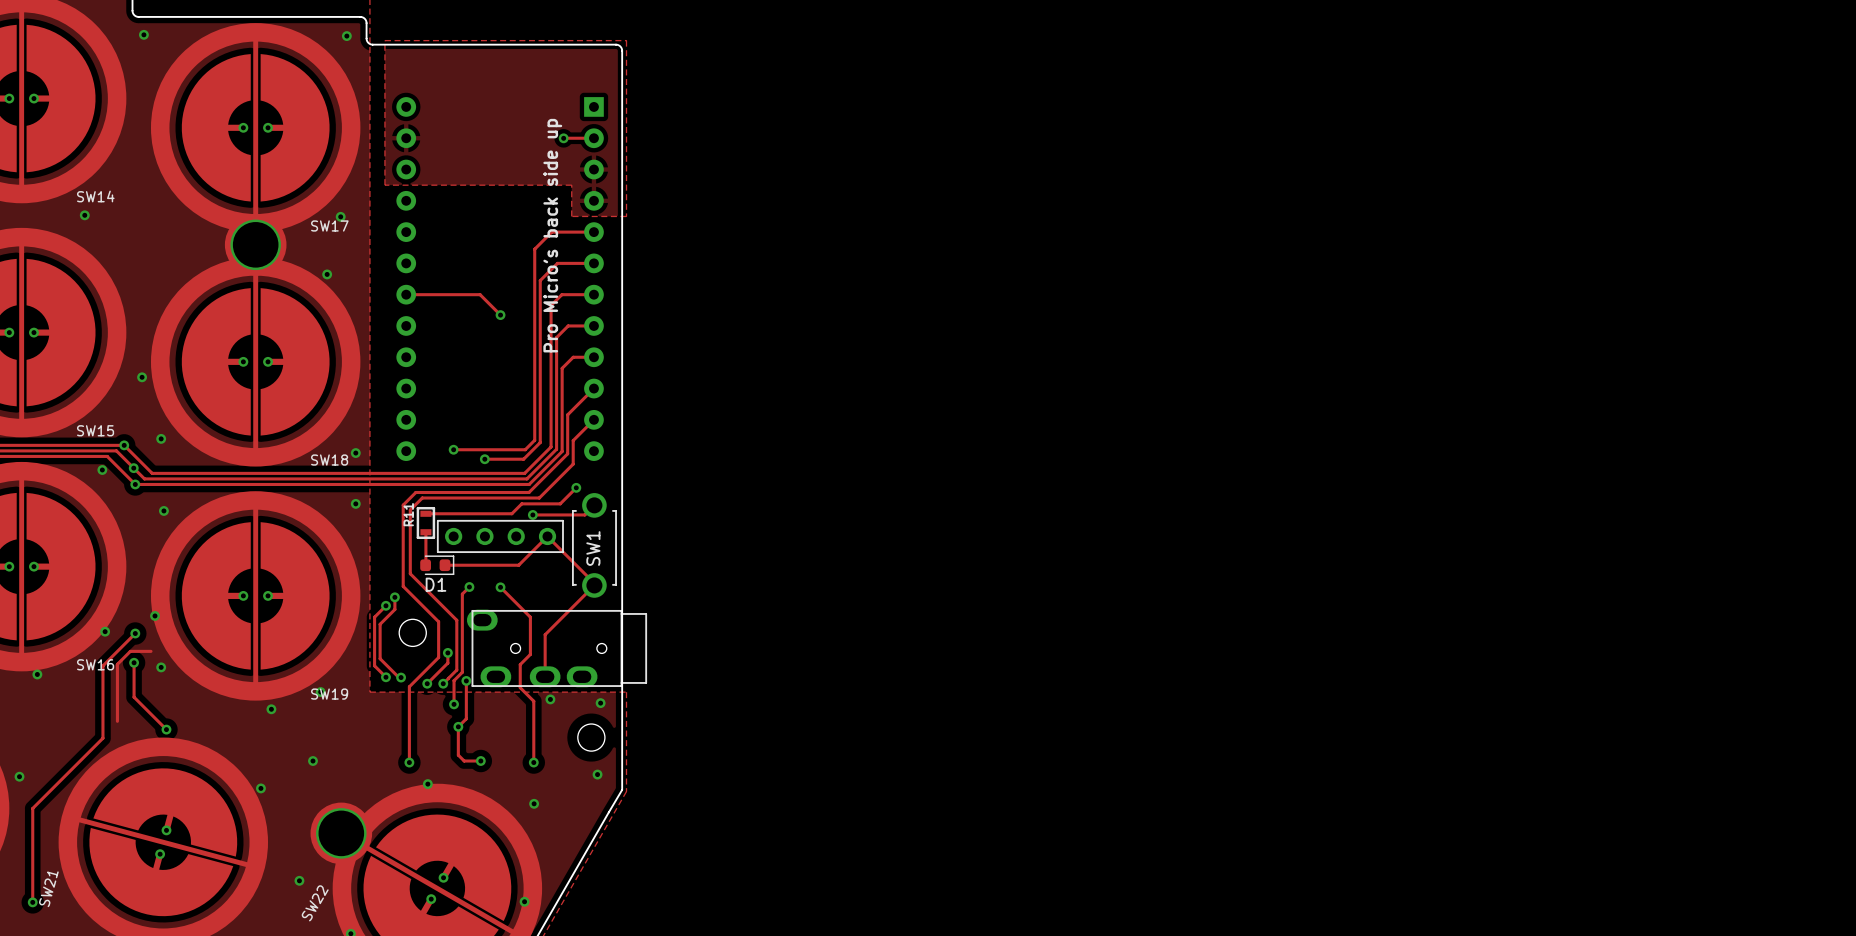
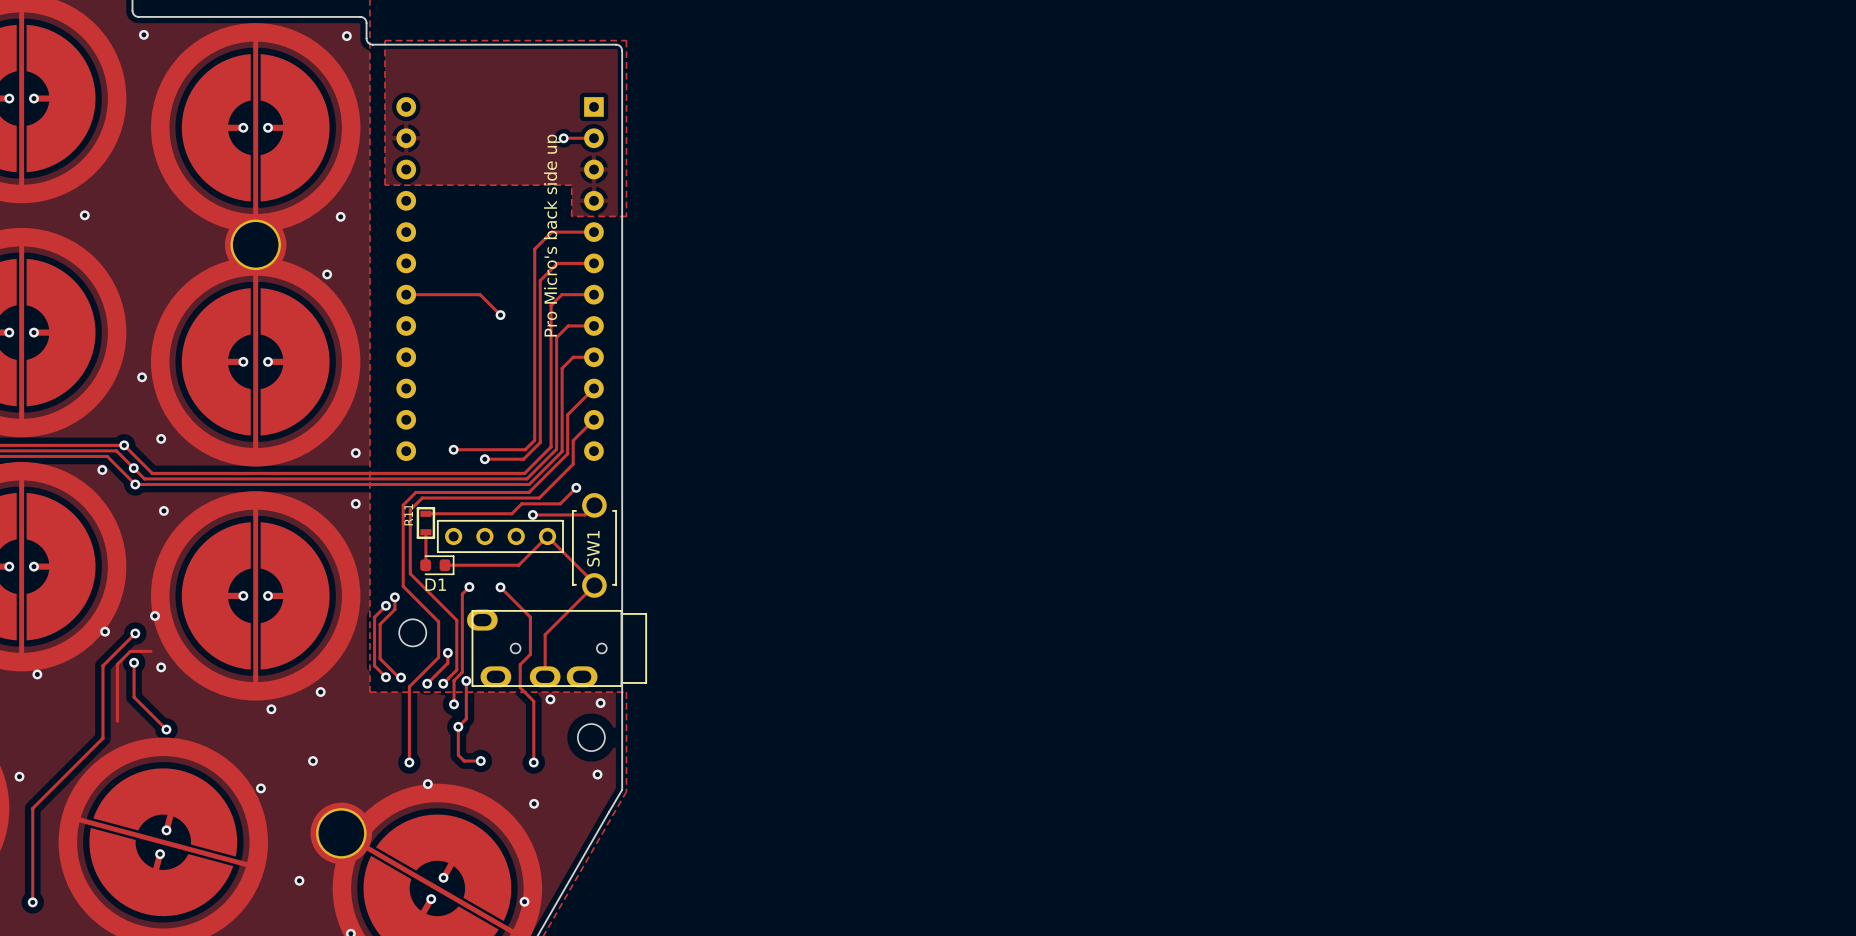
SW14 name: SW14 (95, 196) -> none
SW17 name: SW17 (329, 225) -> none
SW15 name: SW15 (95, 430) -> none
SW18 name: SW18 (329, 460) -> none
SW16 name: SW16 (95, 664) -> none
SW19 name: SW19 (329, 694) -> none
SW21 name: SW21 (48, 889) -> none
SW22 name: SW22 (315, 903) -> none

